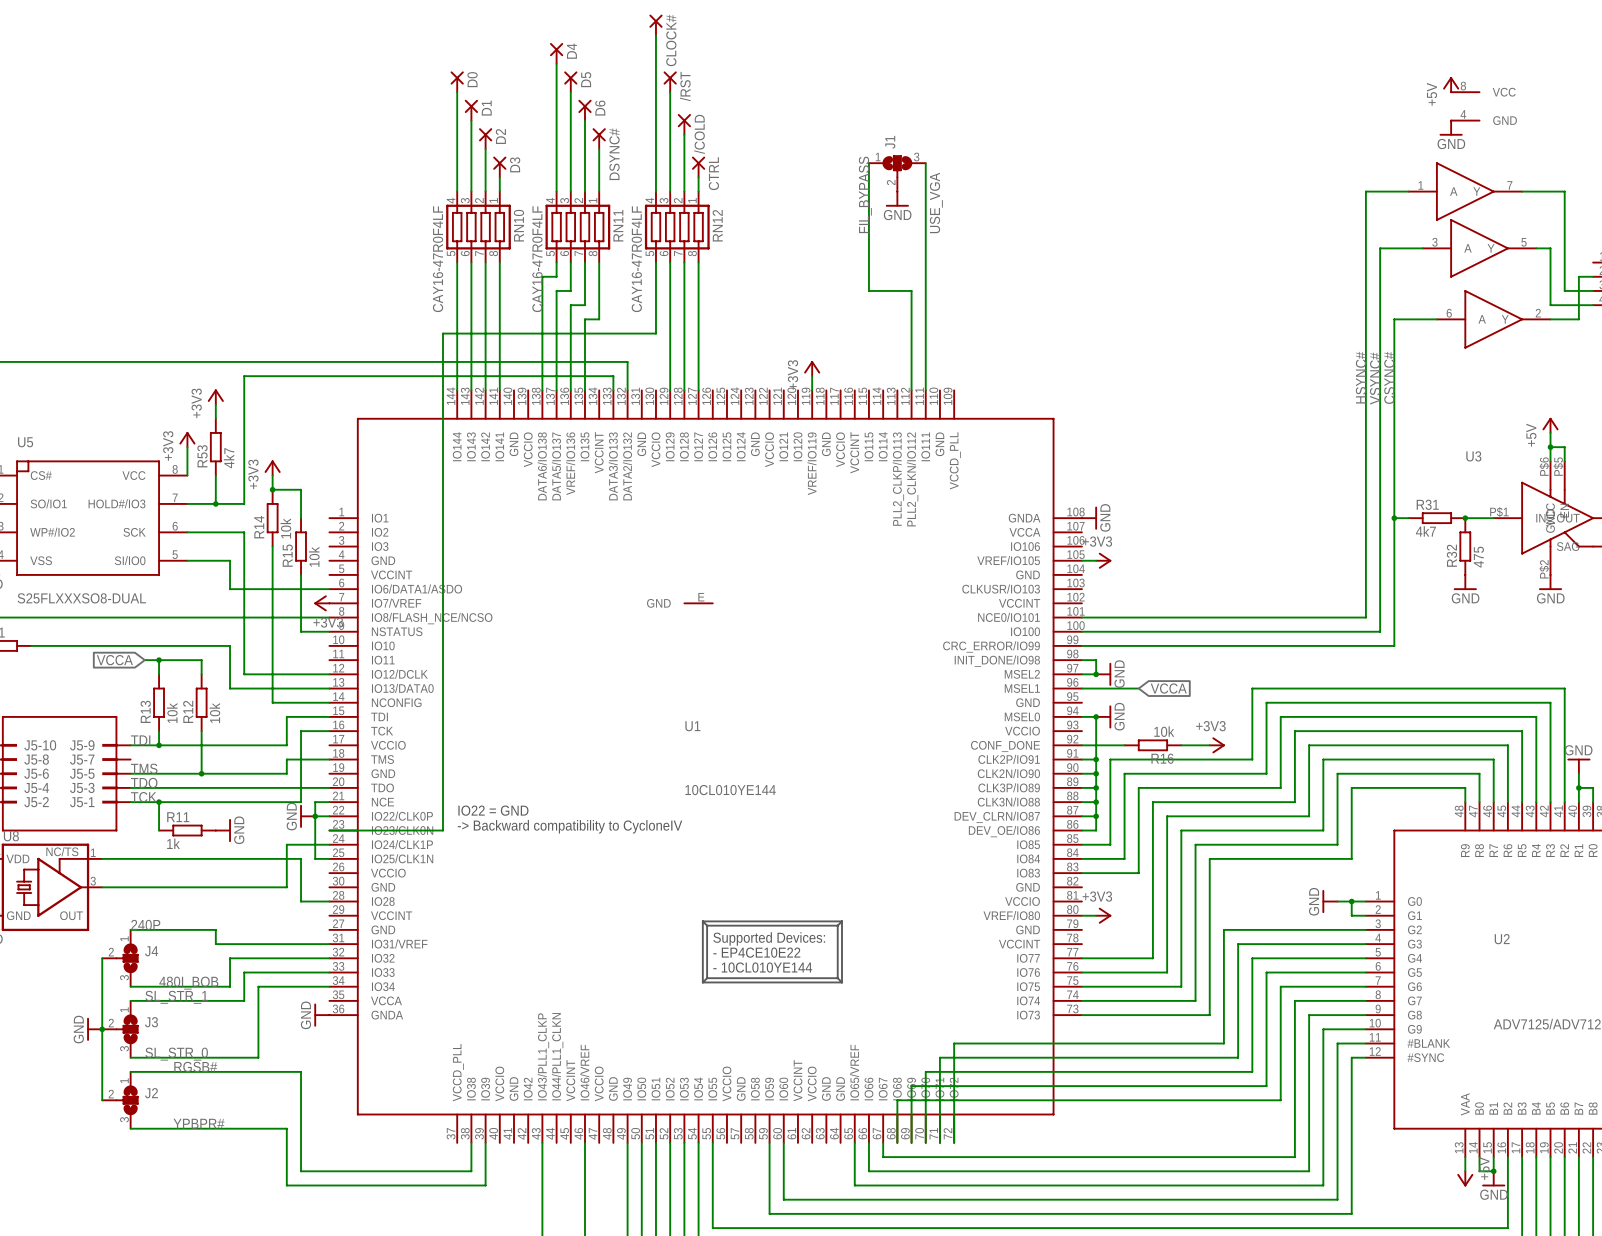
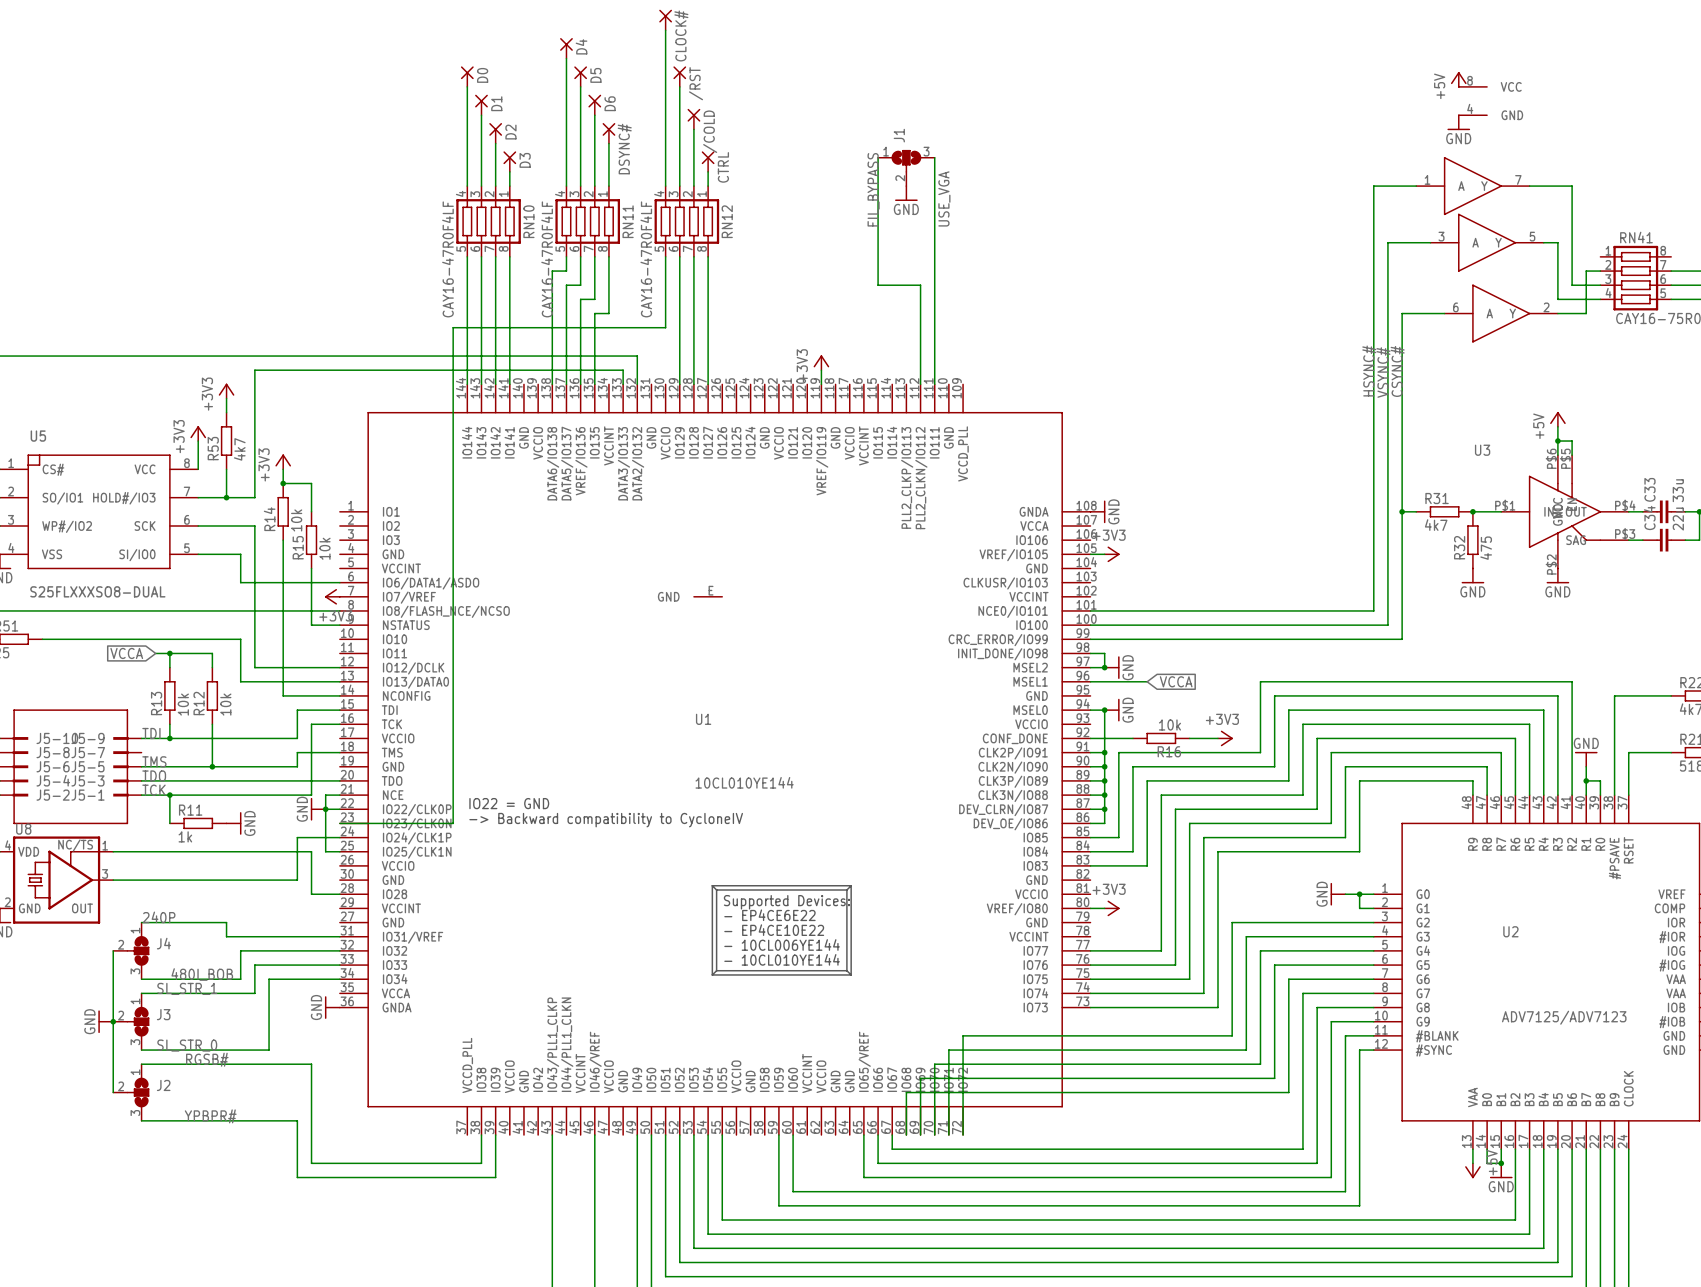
line: none -> (712, 885) (851, 885)
line: none -> (712, 885) (716, 890)
line: none -> (851, 885) (851, 914)
line: none -> (851, 885) (846, 890)
line: none -> (716, 890) (846, 890)
line: none -> (716, 890) (716, 918)
line: none -> (846, 890) (846, 918)
text: none -> Supported Devices: (786, 902)
line: (702, 921) (841, 921) (837, 925) (707, 925) (702, 921) -> (712, 885) (712, 914)
text: none -> - EP4CE6E22 (769, 915)
text: Supported Devices: (769, 938) -> - EP4CE10E22 (774, 930)
text: - EP4CE10E22 (756, 952) -> - 10CL006YE144 (782, 945)

